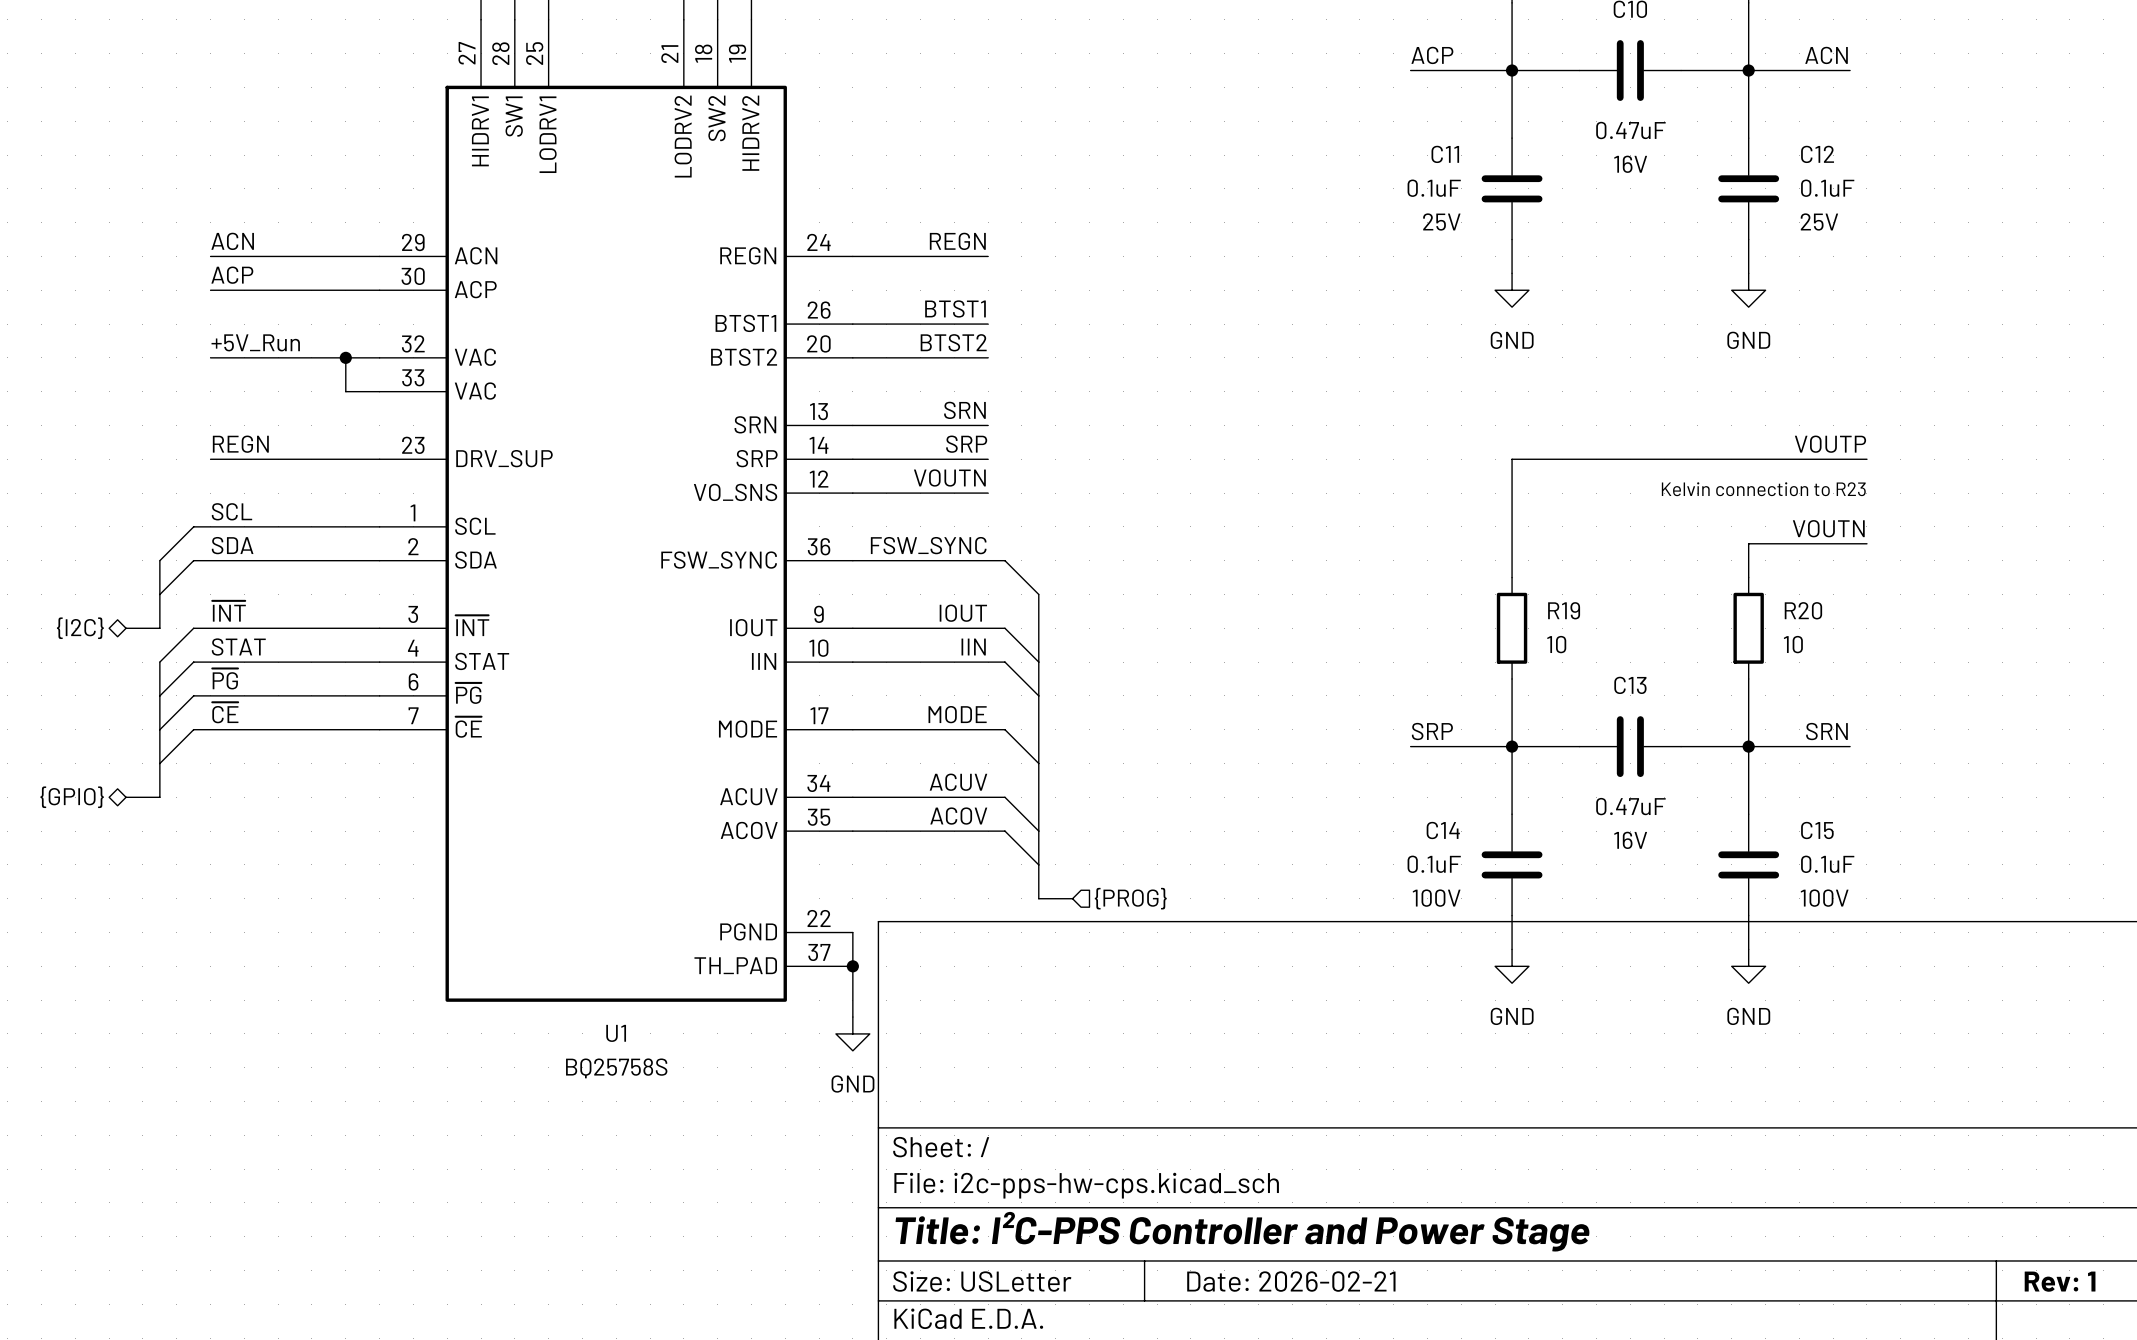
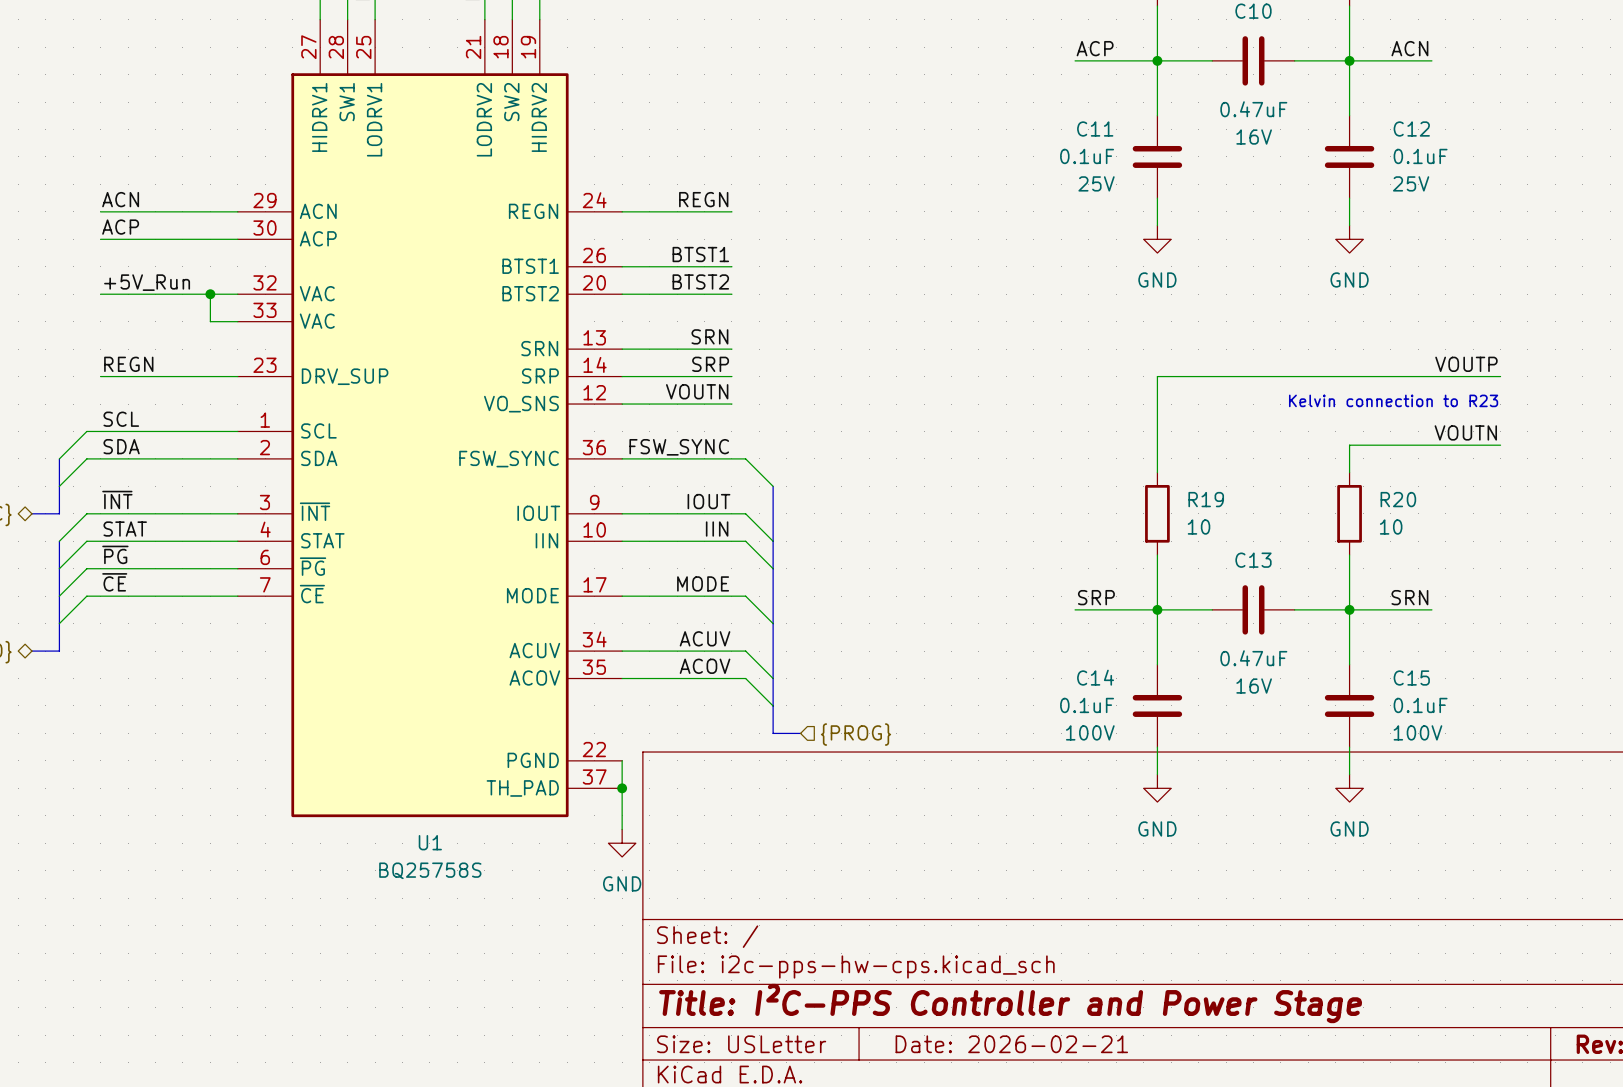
label position: VOUTP (1830, 444) -> VOUTP (1466, 364)
wire: none -> (1445, 376) (1500, 376)
text position: Kelvin connection to R23 (1763, 489) -> Kelvin connection to R23 (1393, 400)
label position: VOUTN (1828, 528) -> VOUTN (1465, 432)
wire: none -> (1445, 445) (1500, 445)

